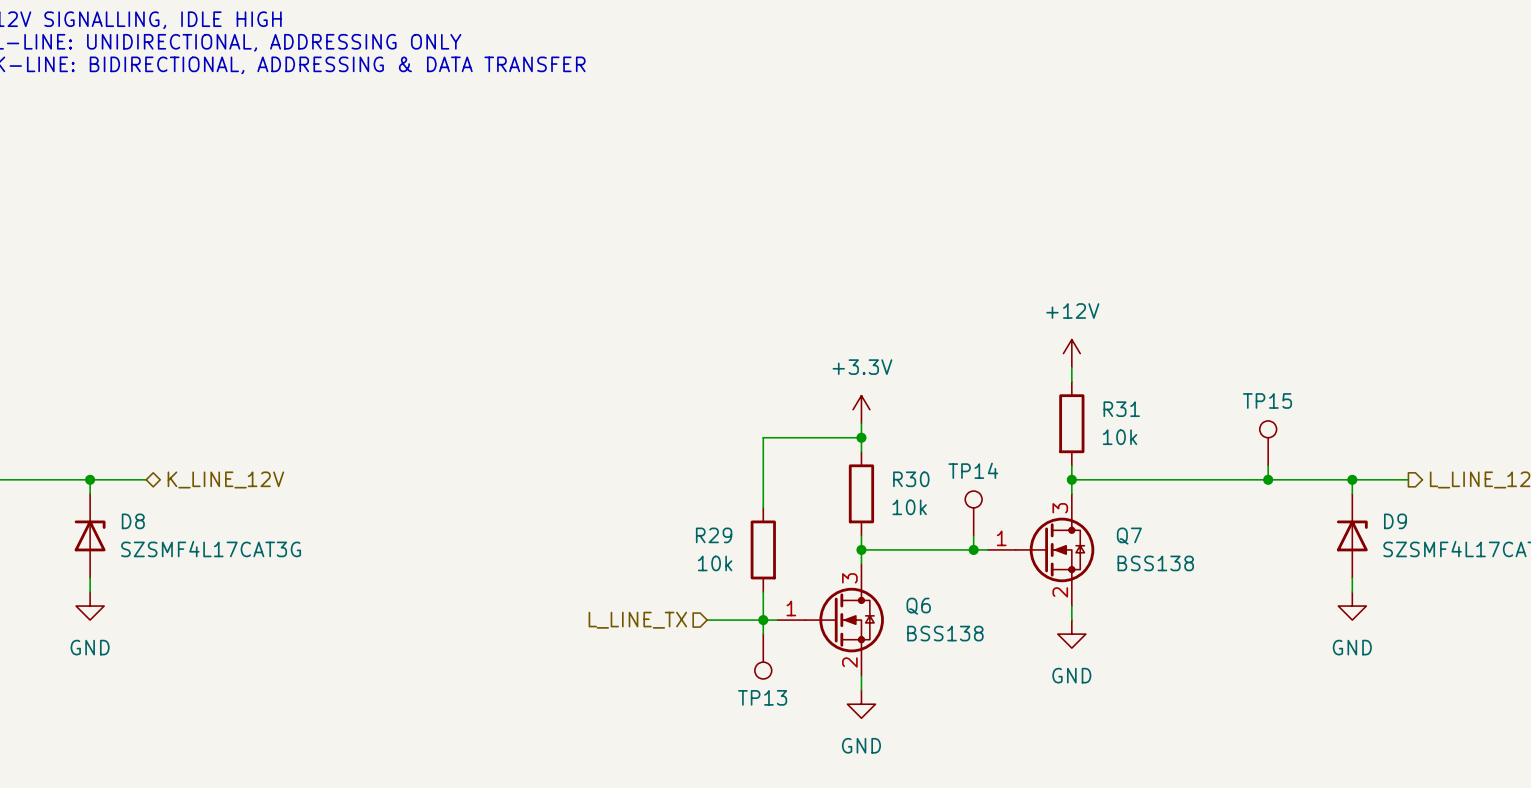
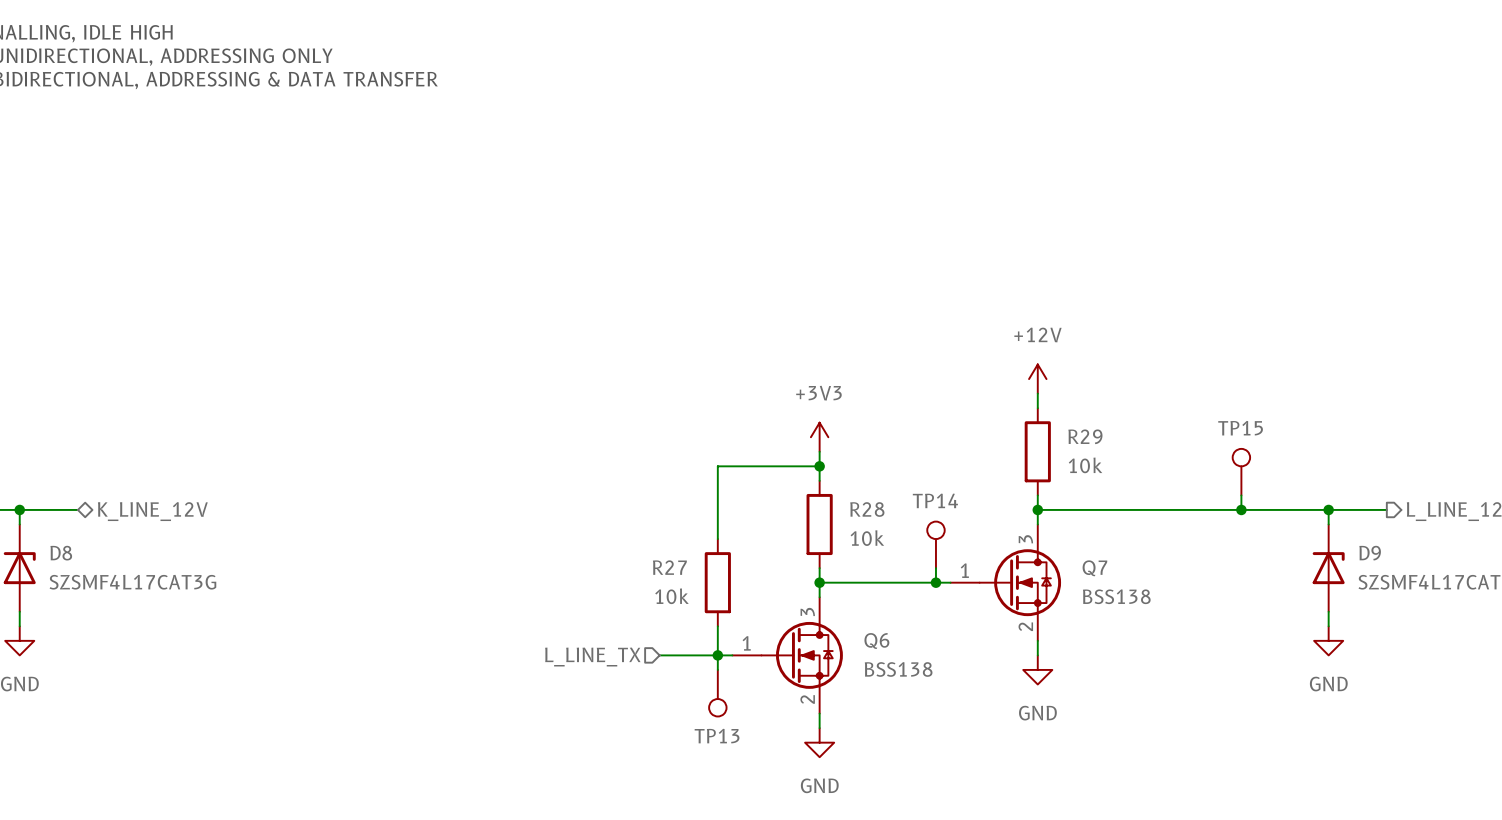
power symbol: +3.3V (861, 409) -> +3V3 (819, 437)
R31 name: R31 (1121, 409) -> R29 (1085, 436)
R30 name: R30 (911, 479) -> R28 (867, 509)
R29 name: R29 (714, 535) -> R27 (669, 567)

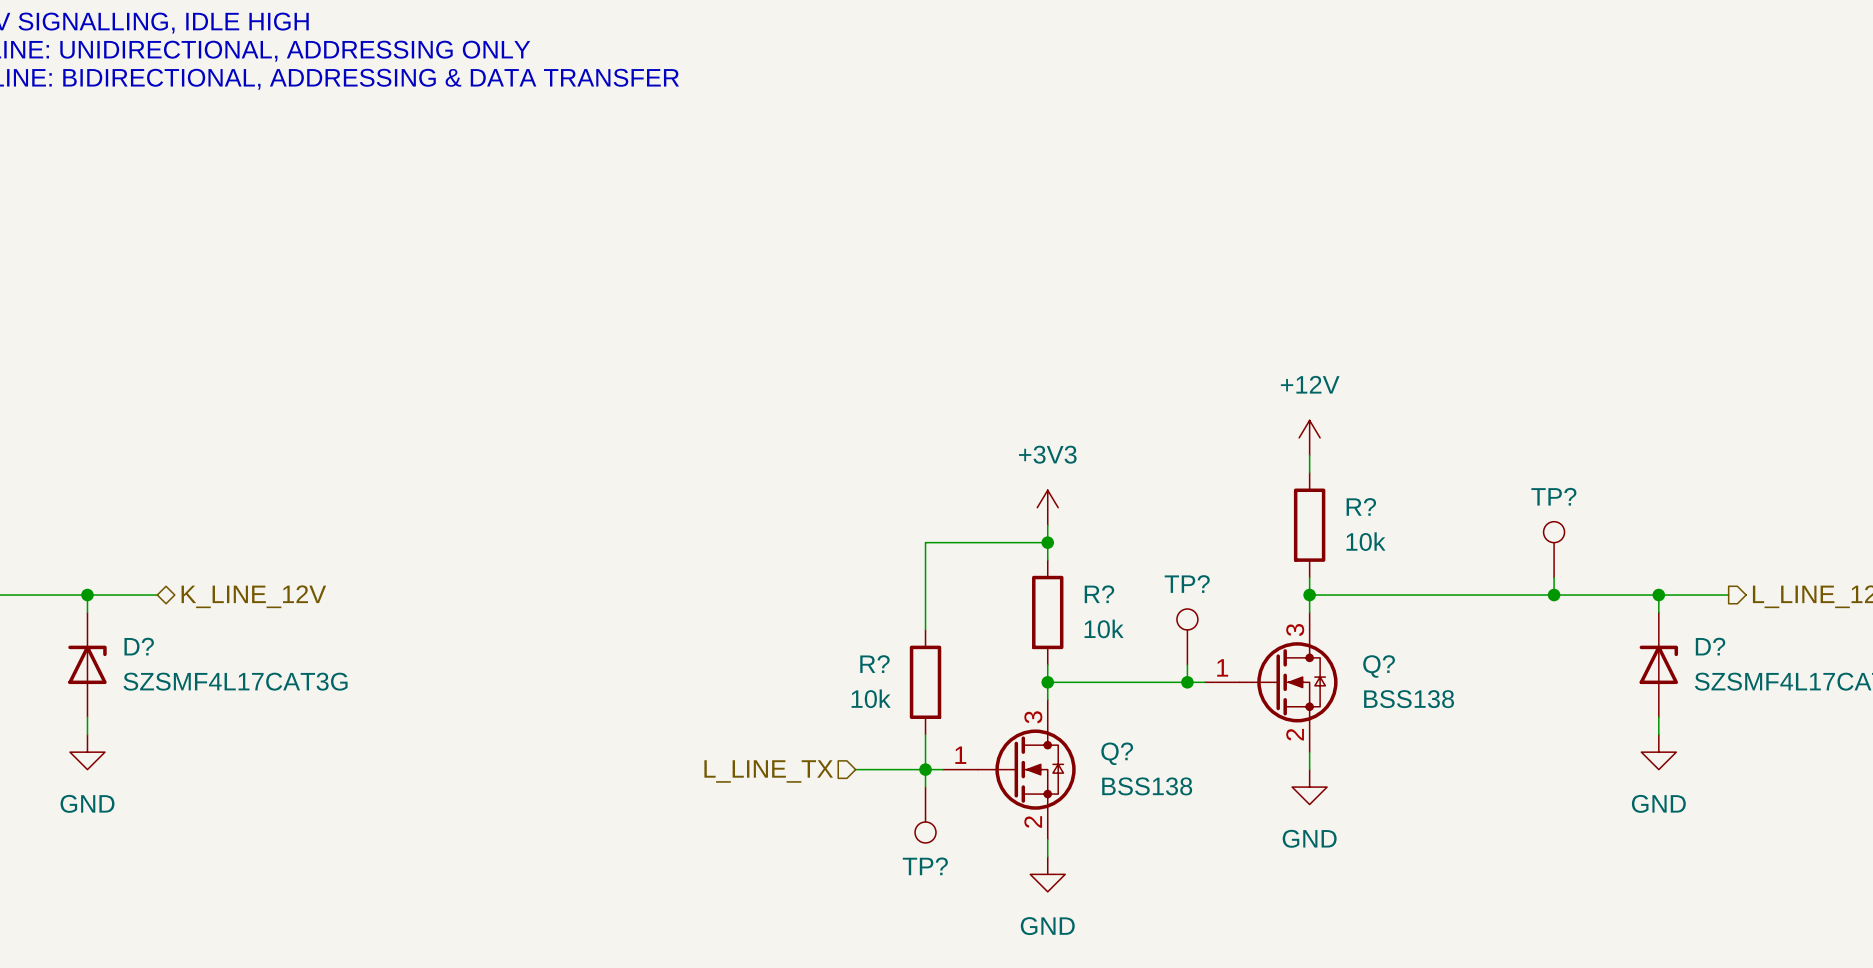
TP15 name: TP15 (1240, 428) -> TP? (1553, 496)
R29 name: R29 (1085, 436) -> R? (1361, 506)
TP14 name: TP14 (935, 500) -> TP? (1187, 584)
R28 name: R28 (867, 509) -> R? (1099, 594)
D8 name: D8 (61, 553) -> D? (139, 646)
D9 name: D9 (1370, 553) -> D? (1710, 646)
R27 name: R27 (669, 567) -> R? (874, 664)
Q7 name: Q7 (1094, 568) -> Q? (1379, 666)
Q6 name: Q6 (876, 641) -> Q? (1117, 753)
TP13 name: TP13 (717, 736) -> TP? (925, 866)

